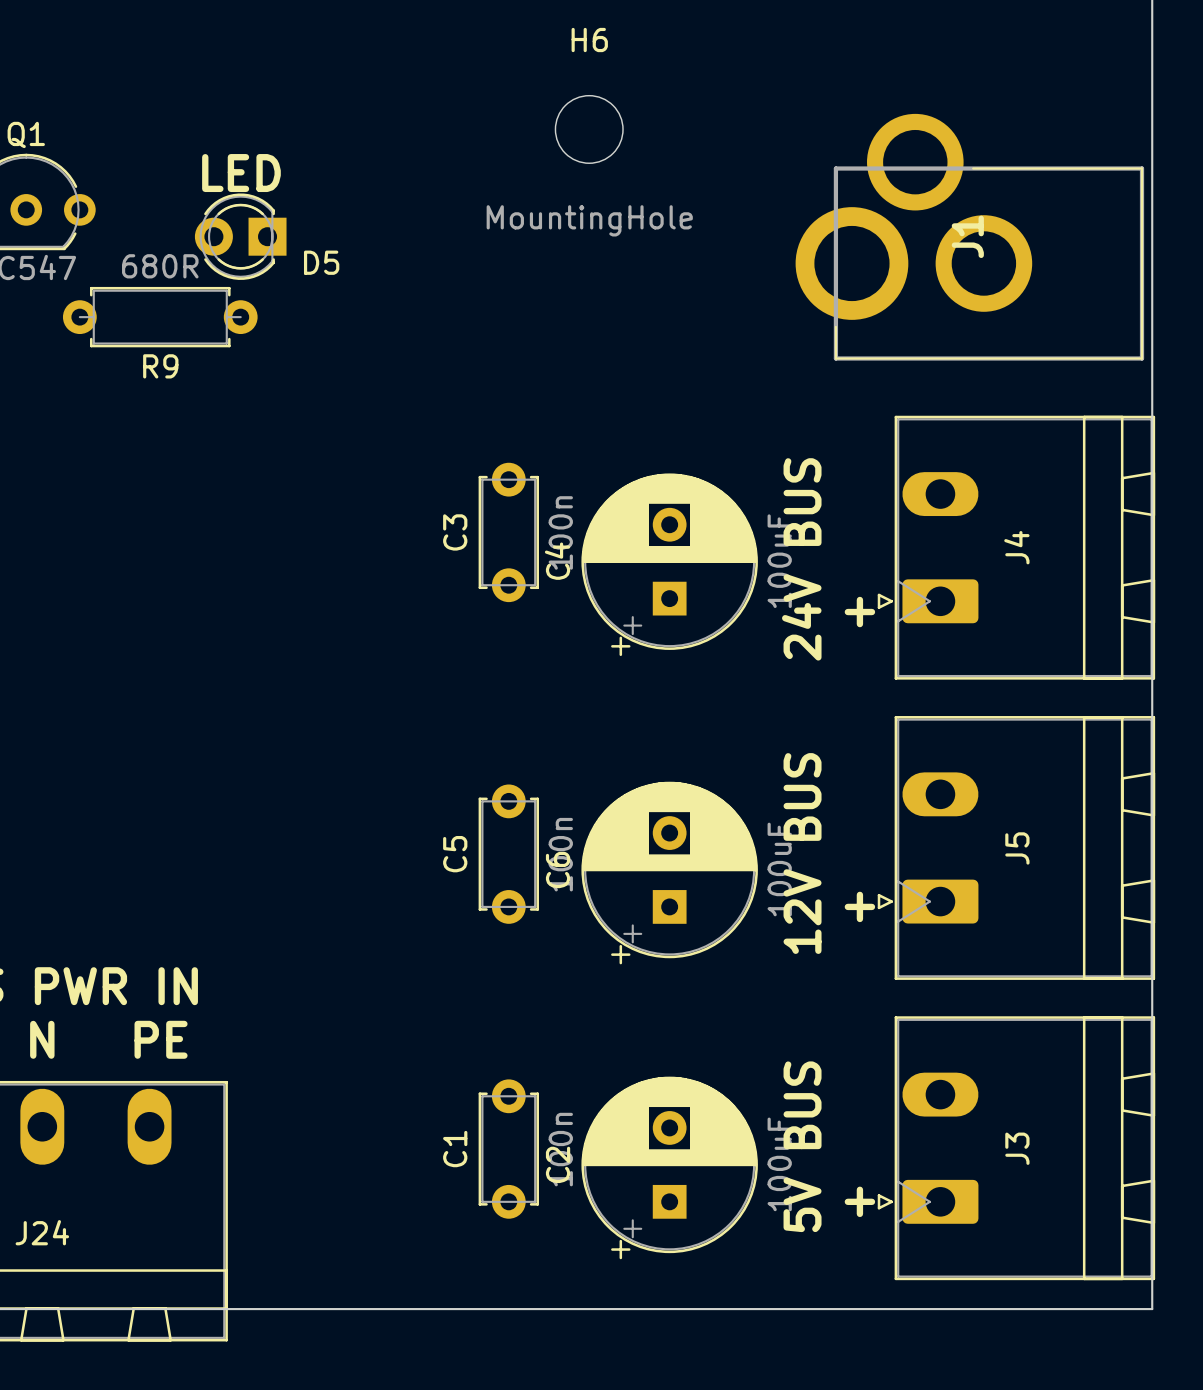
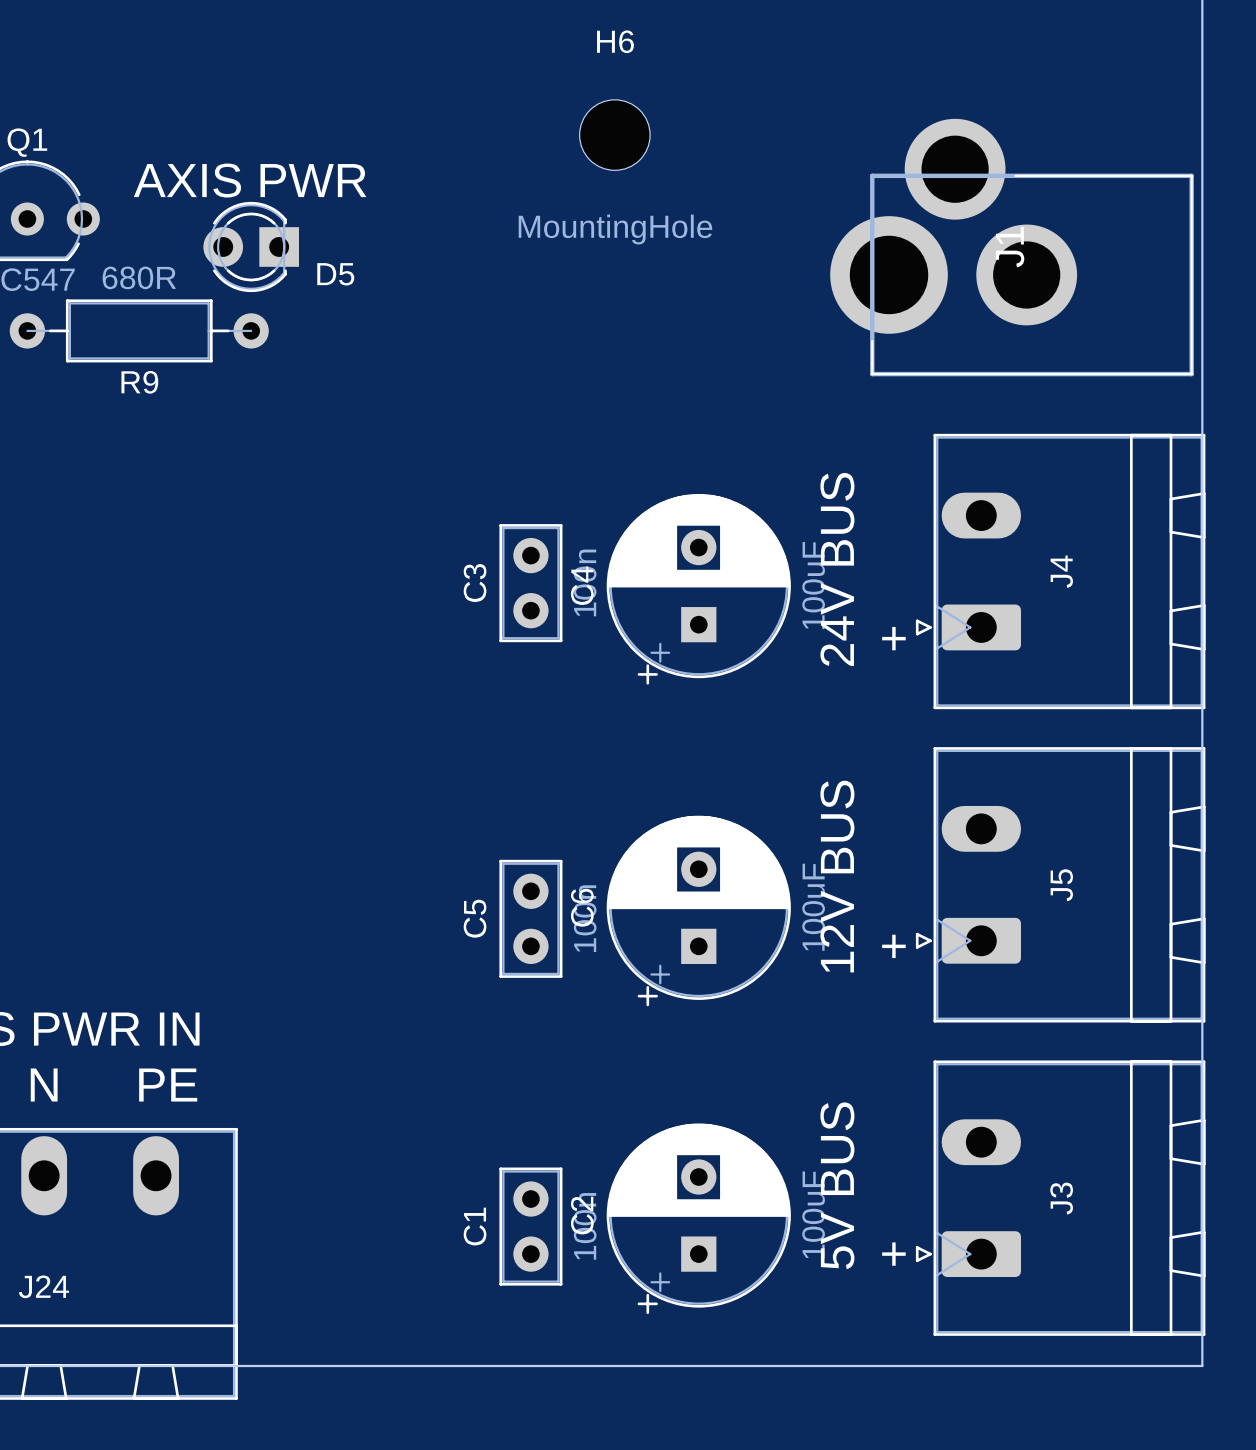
D5 value: LED (241, 173) -> AXIS PWR (250, 180)
R9 footprint: [62, 286, 258, 348] -> [9, 299, 269, 363]
C3 footprint: [478, 462, 539, 603] -> [499, 524, 563, 643]
C5 footprint: [478, 784, 539, 924] -> [499, 859, 563, 978]
C1 footprint: [478, 1079, 539, 1219] -> [499, 1167, 563, 1286]

